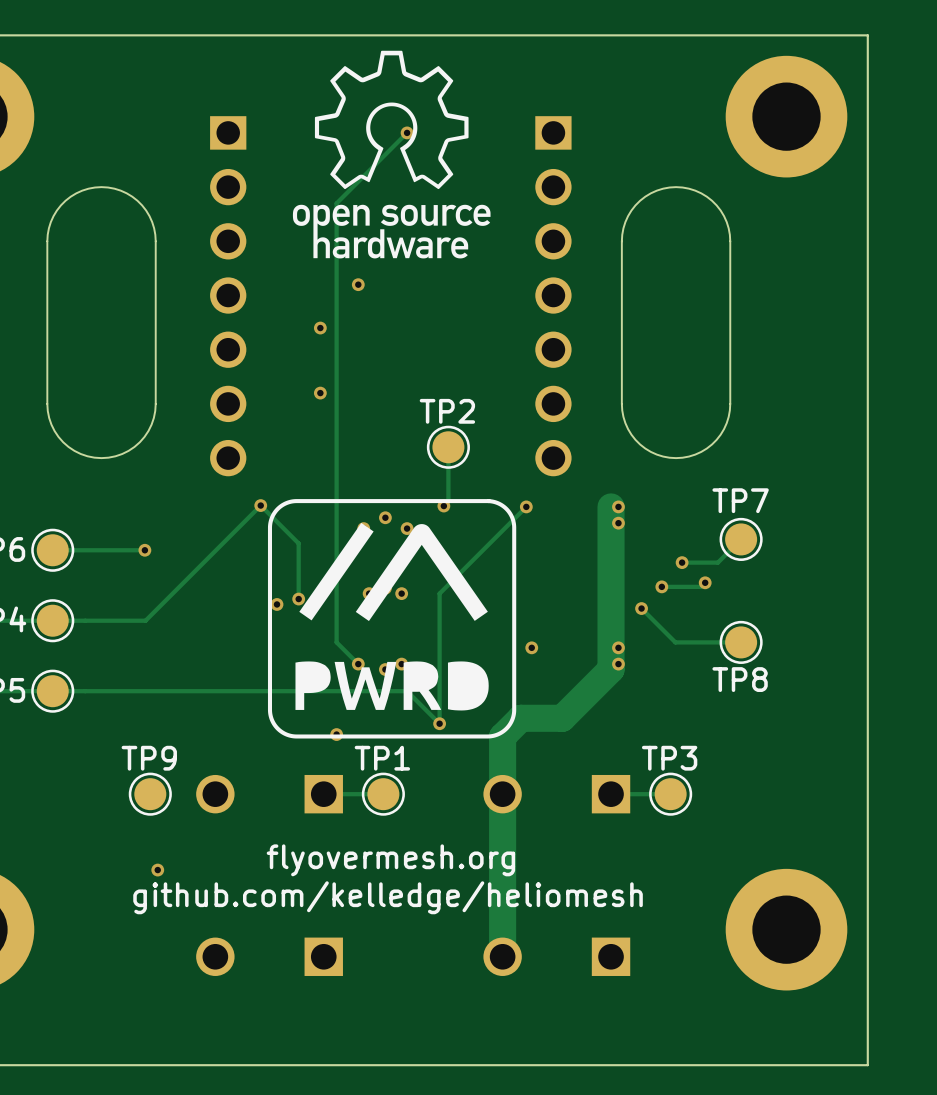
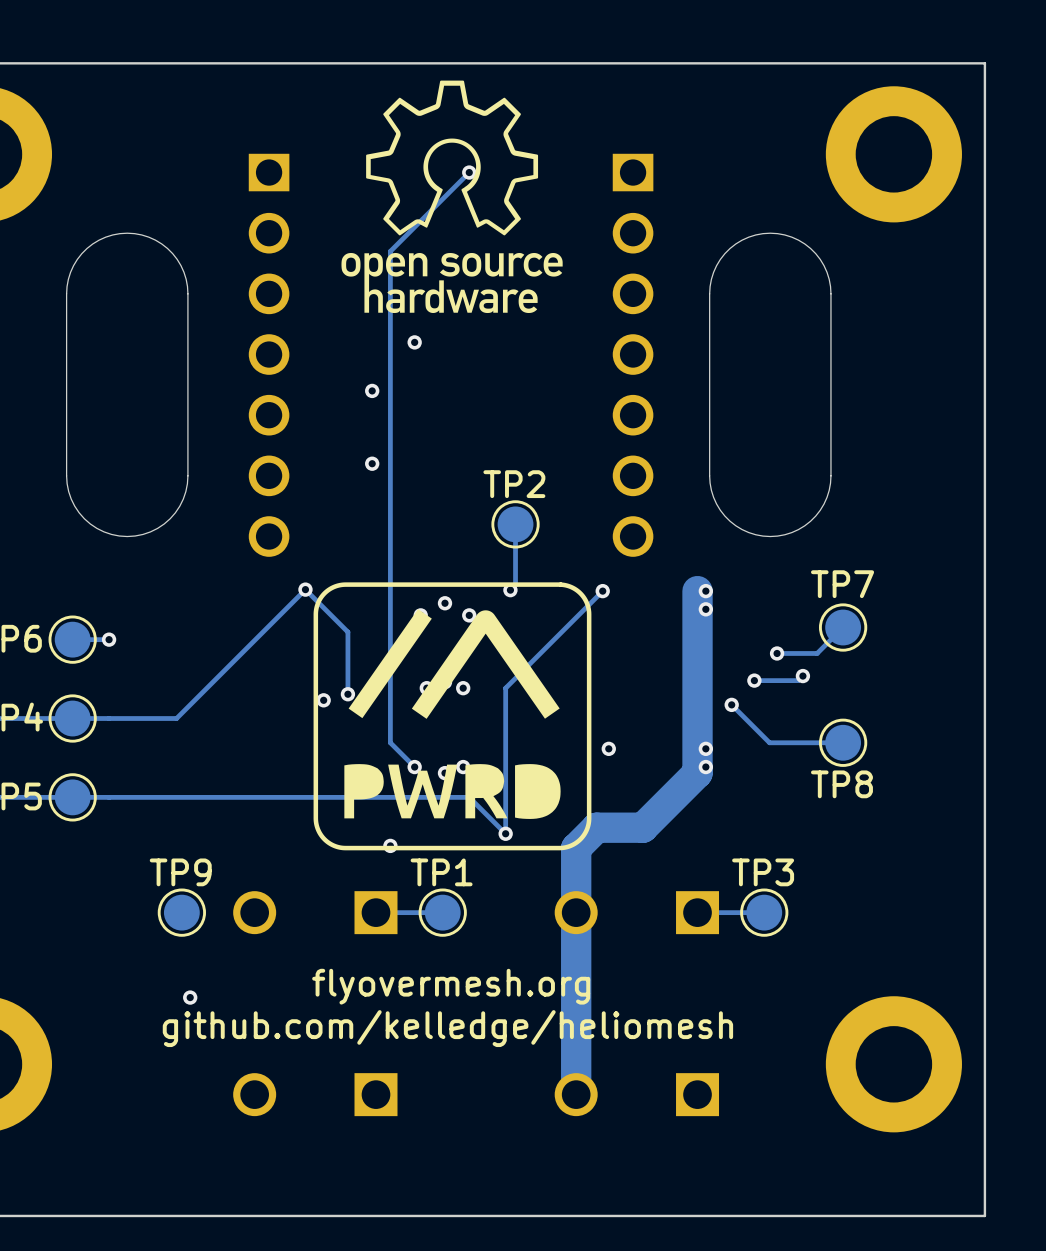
track: (144, 550) (85, 550) -> none
via position: (144, 550) -> (109, 639)

